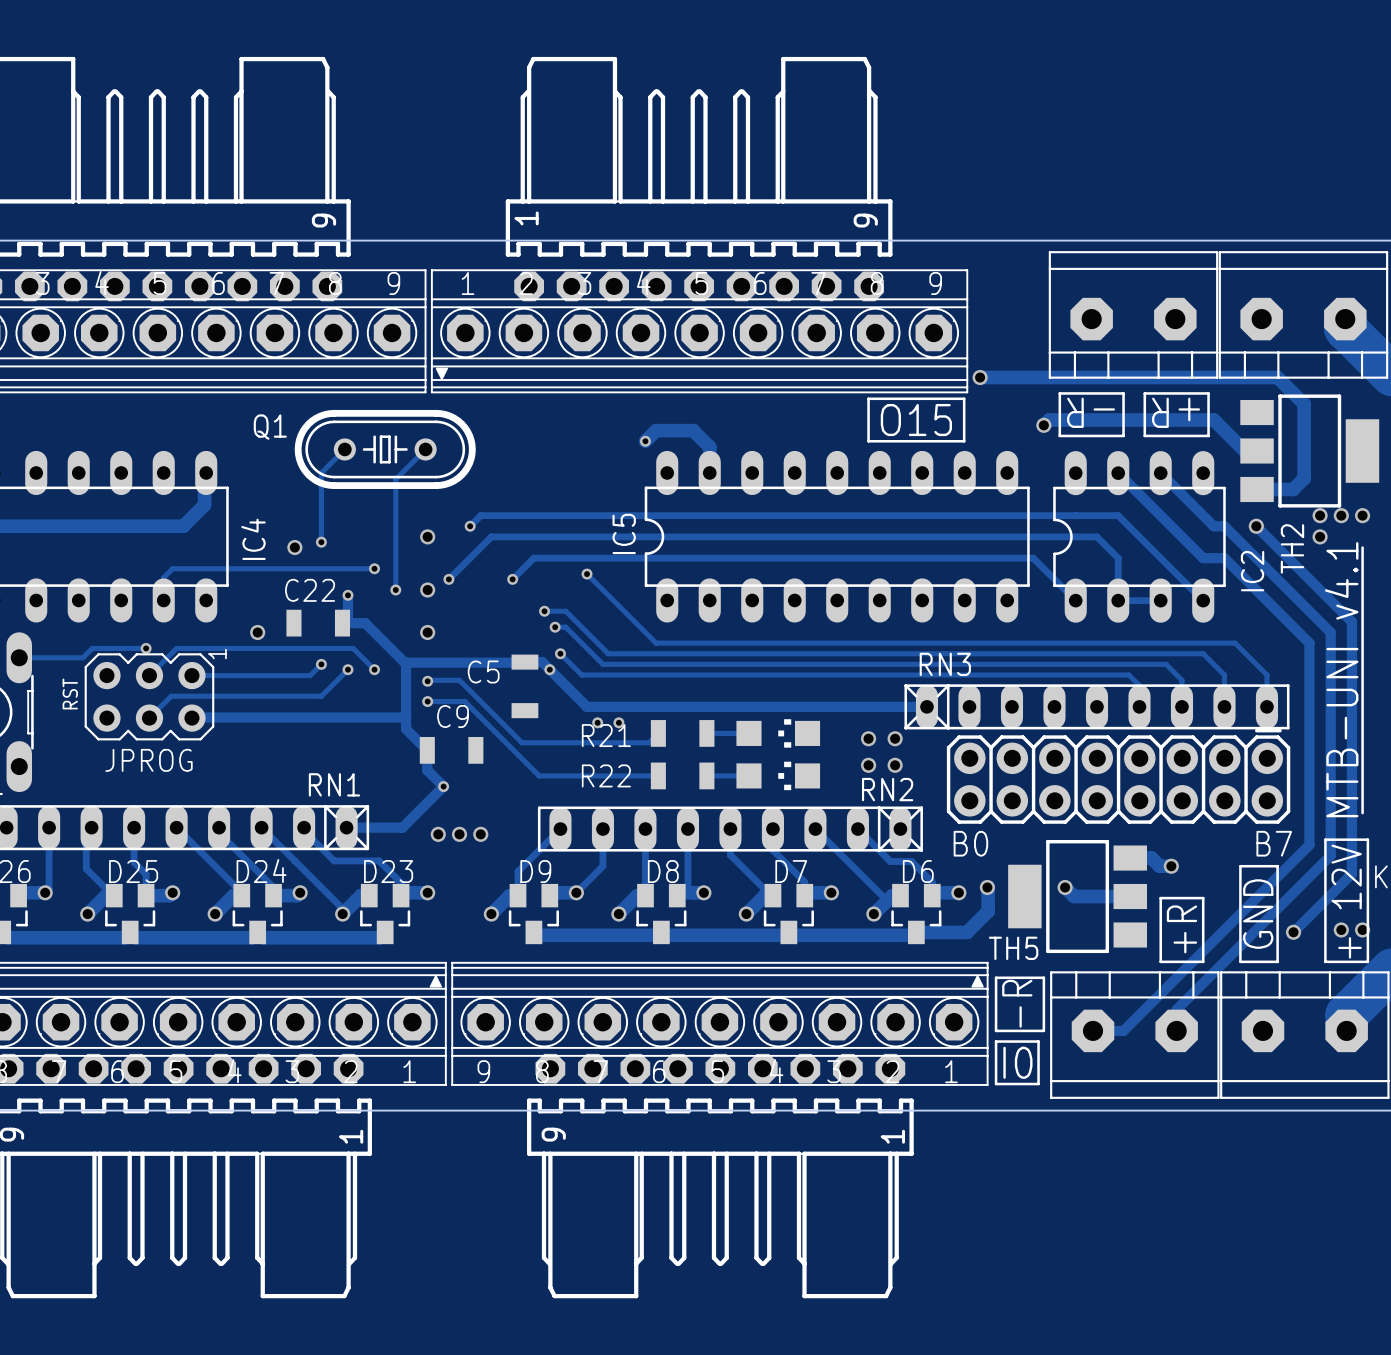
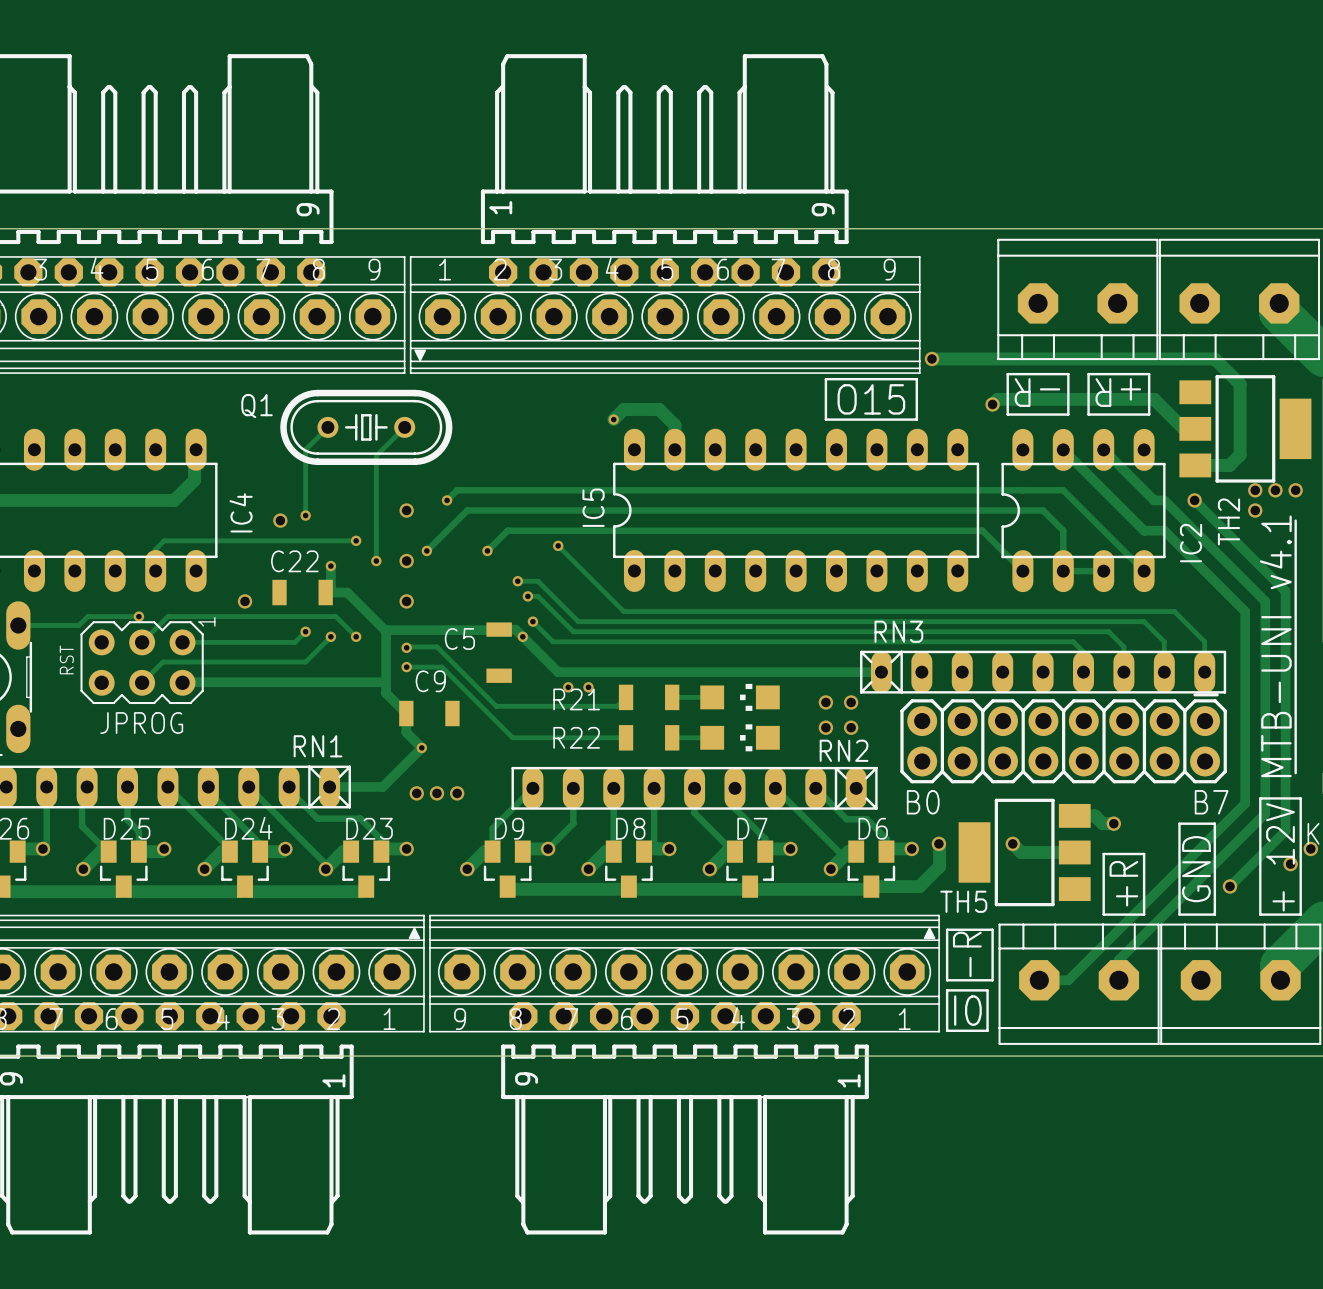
via: none -> (1310, 848)
via: none -> (1290, 864)
via: (1341, 929) -> none
via: (1362, 929) -> none

